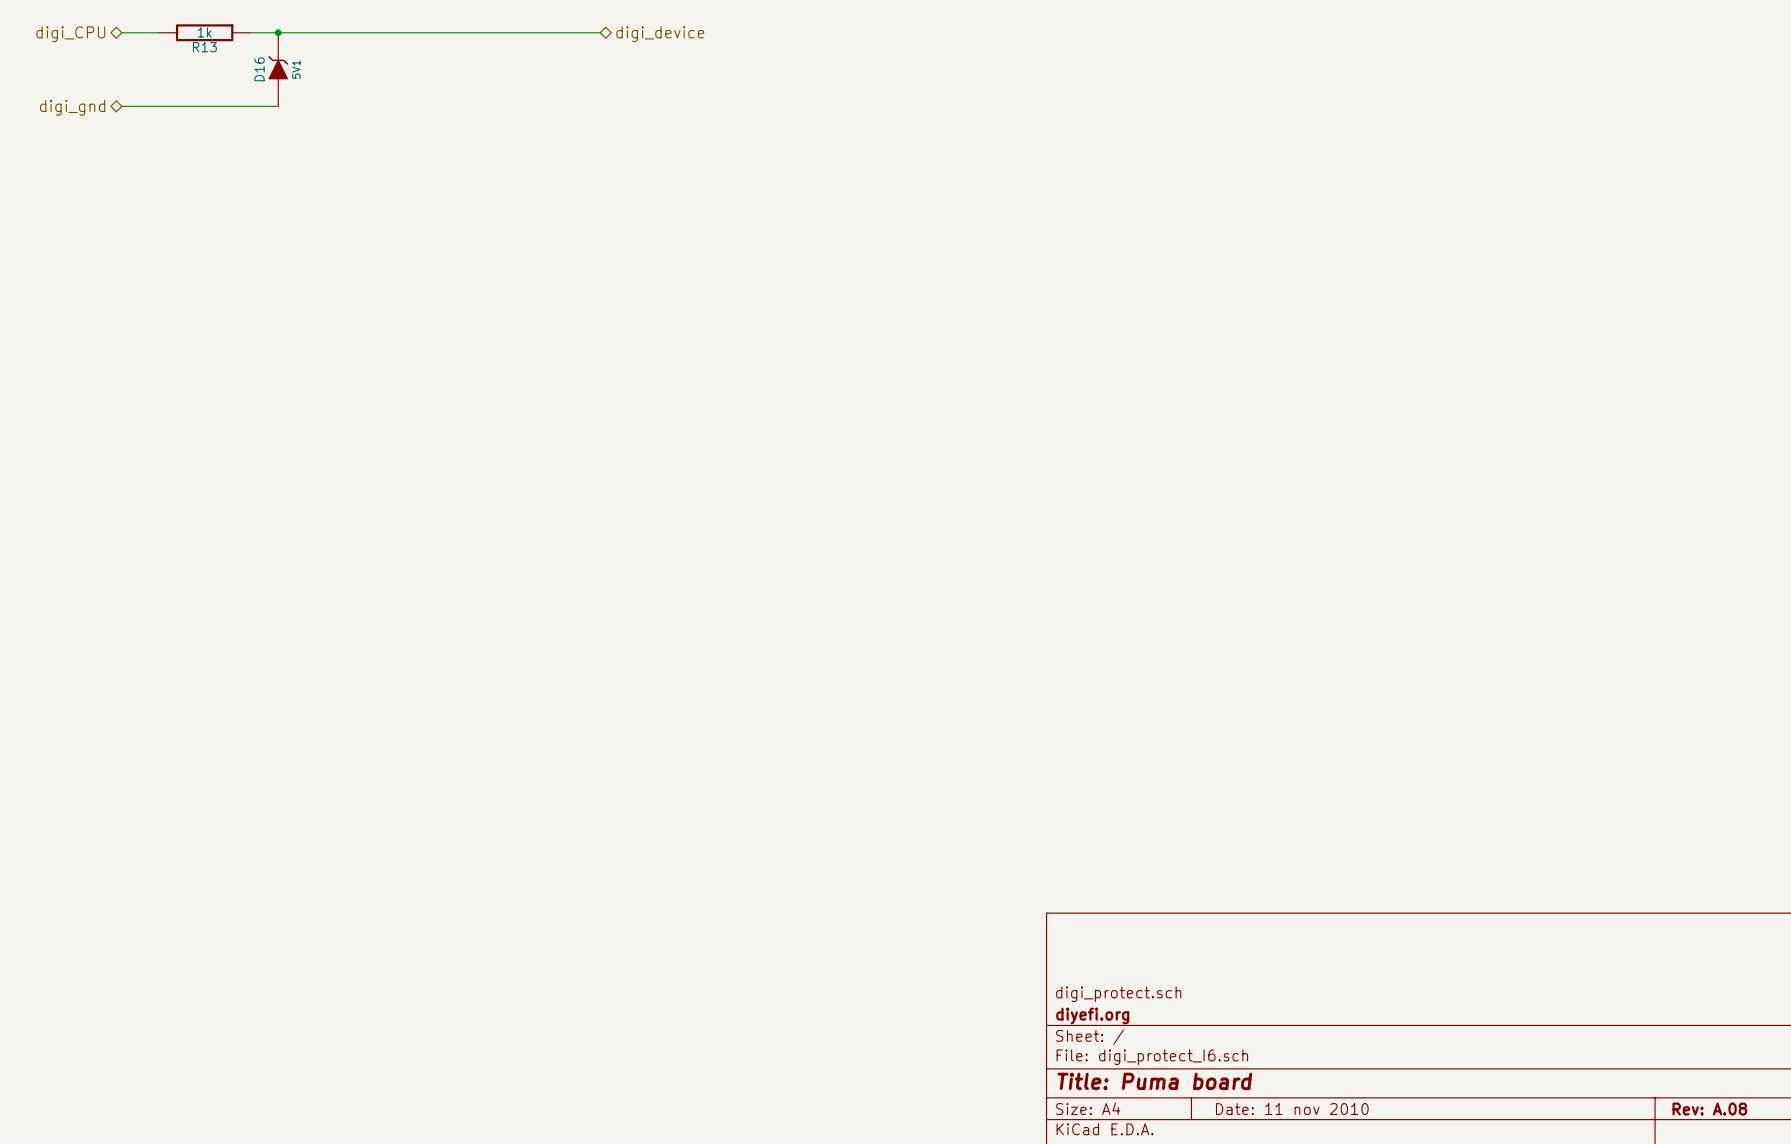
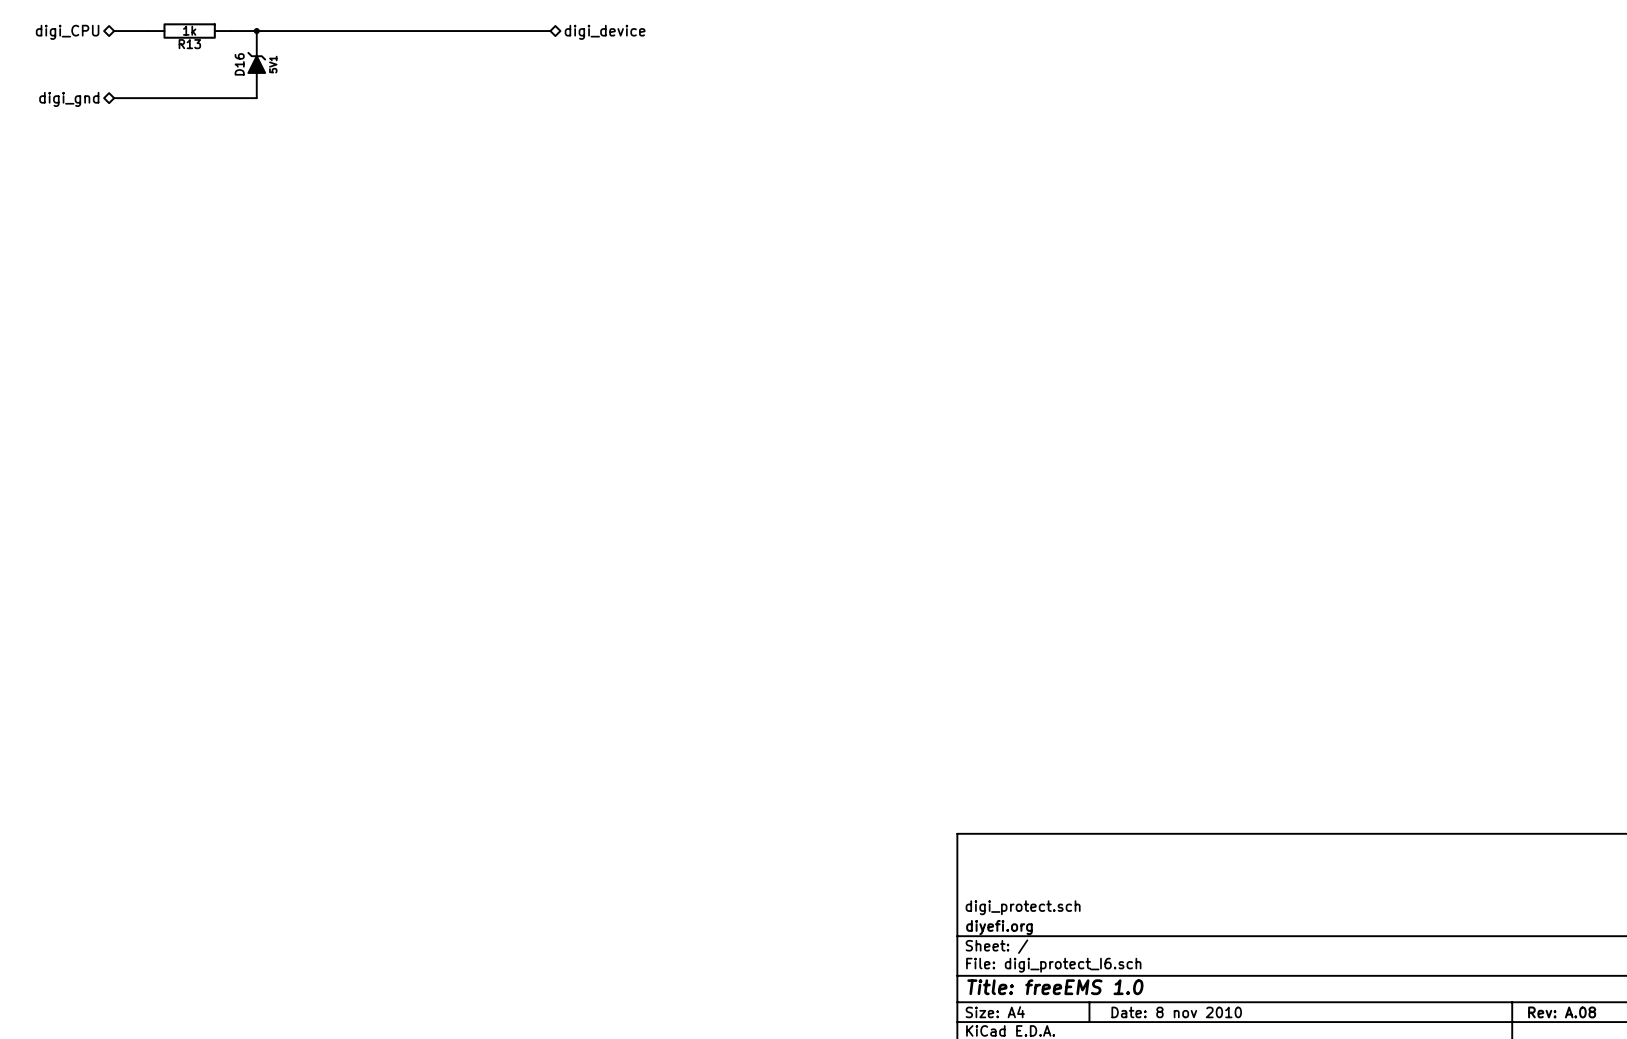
title block: Title: Puma board (1154, 1081) -> Title: freeEMS 1.0 (1055, 987)
title block: Date: 11 nov 2010 (1292, 1109) -> Date: 8 nov 2010 (1176, 1012)

